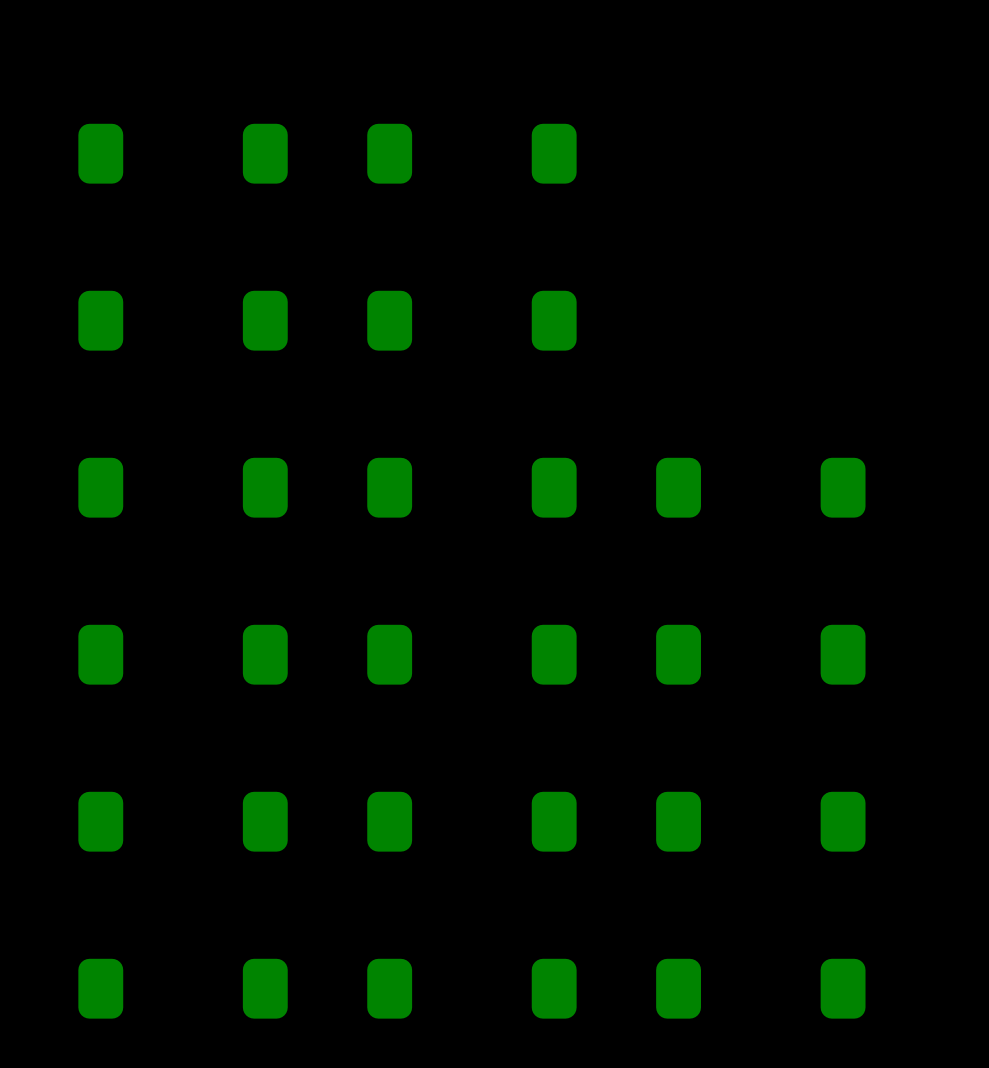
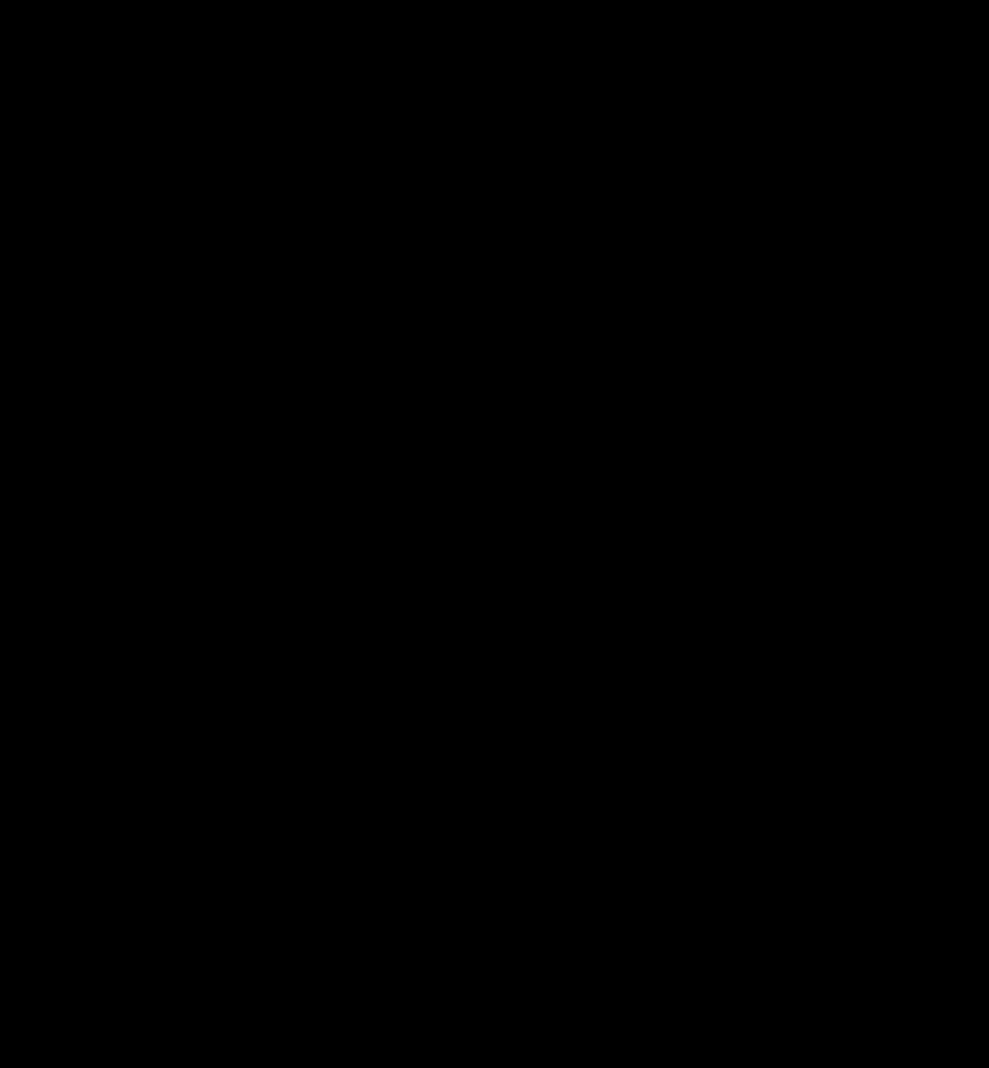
part: (183, 153) -> none
part: (471, 153) -> none
part: (183, 320) -> none
part: (471, 320) -> none
part: (183, 487) -> none
part: (471, 487) -> none
part: (760, 487) -> none
part: (183, 654) -> none
part: (471, 654) -> none
part: (760, 654) -> none
part: (183, 821) -> none
part: (471, 821) -> none
part: (760, 821) -> none
part: (183, 988) -> none
part: (471, 988) -> none
part: (760, 988) -> none

